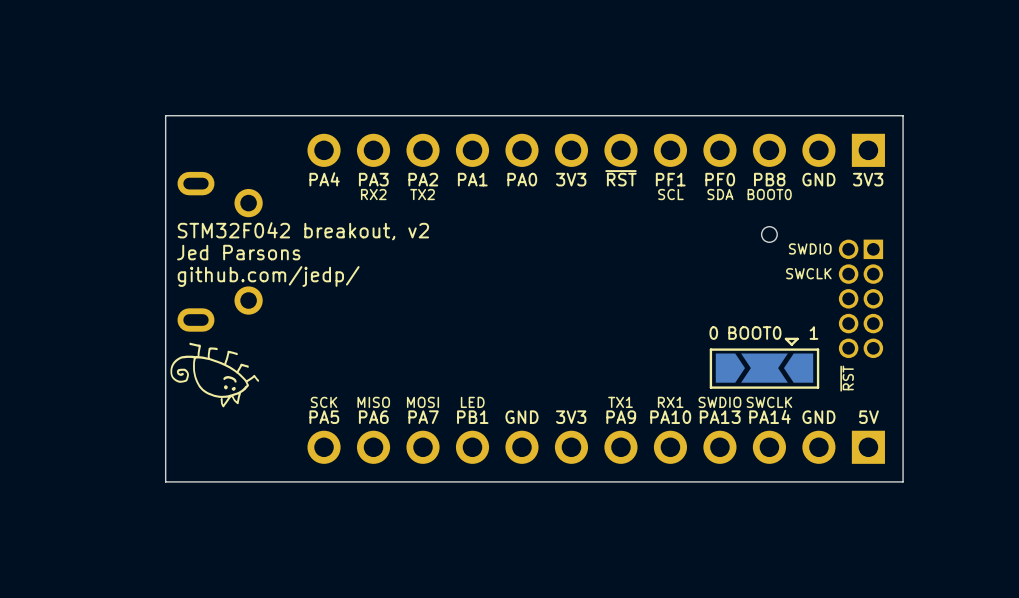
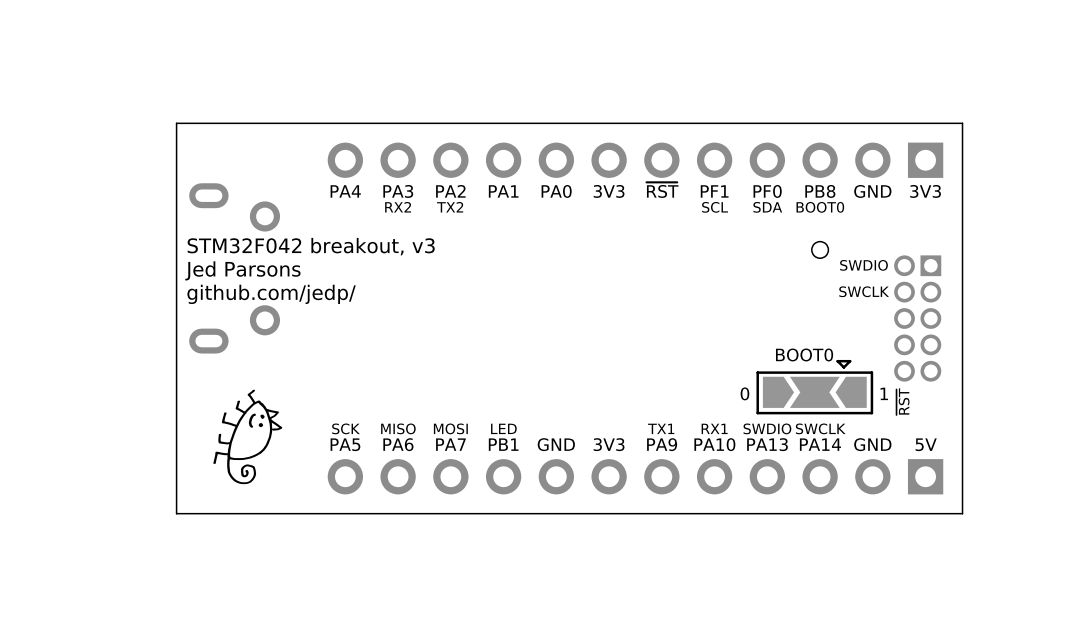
text: STM32F042 breakout, v2 (303, 231) -> STM32F042 breakout, v3 (311, 246)
text position: 0 (713, 333) -> 0 (744, 393)
text position: 1 (813, 333) -> 1 (884, 393)
drawing: [170, 342, 260, 408] -> none
drawing: none -> [213, 389, 283, 485]

